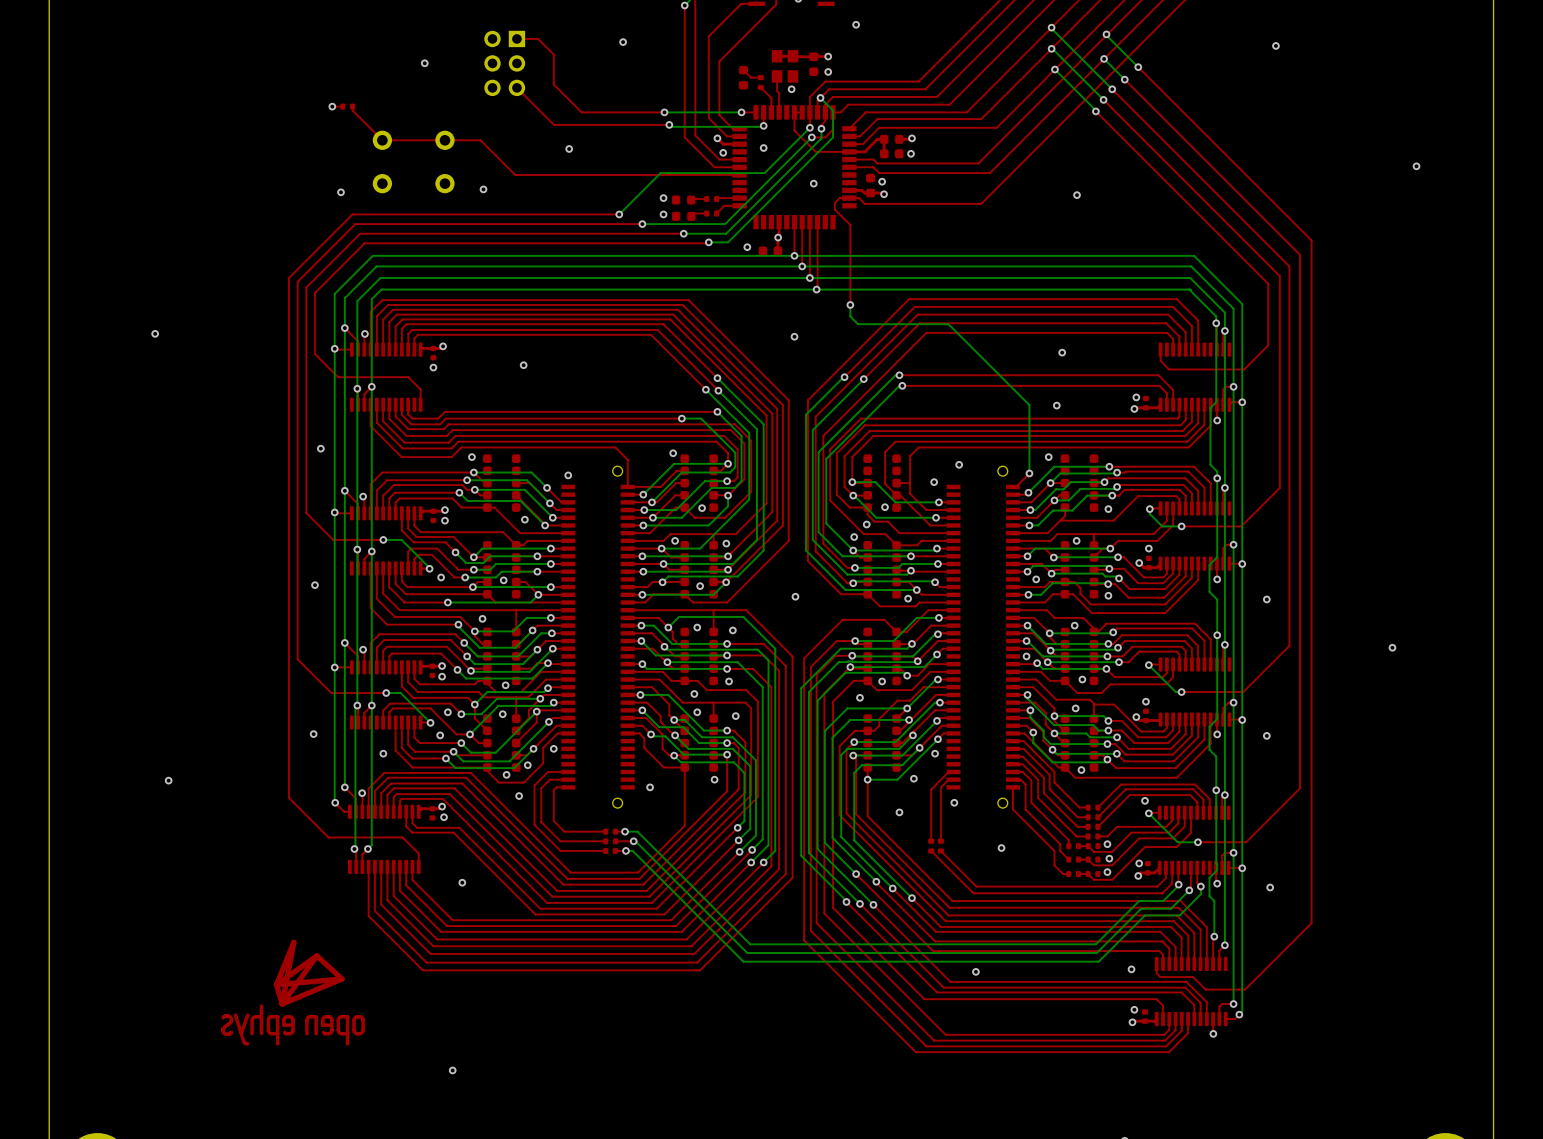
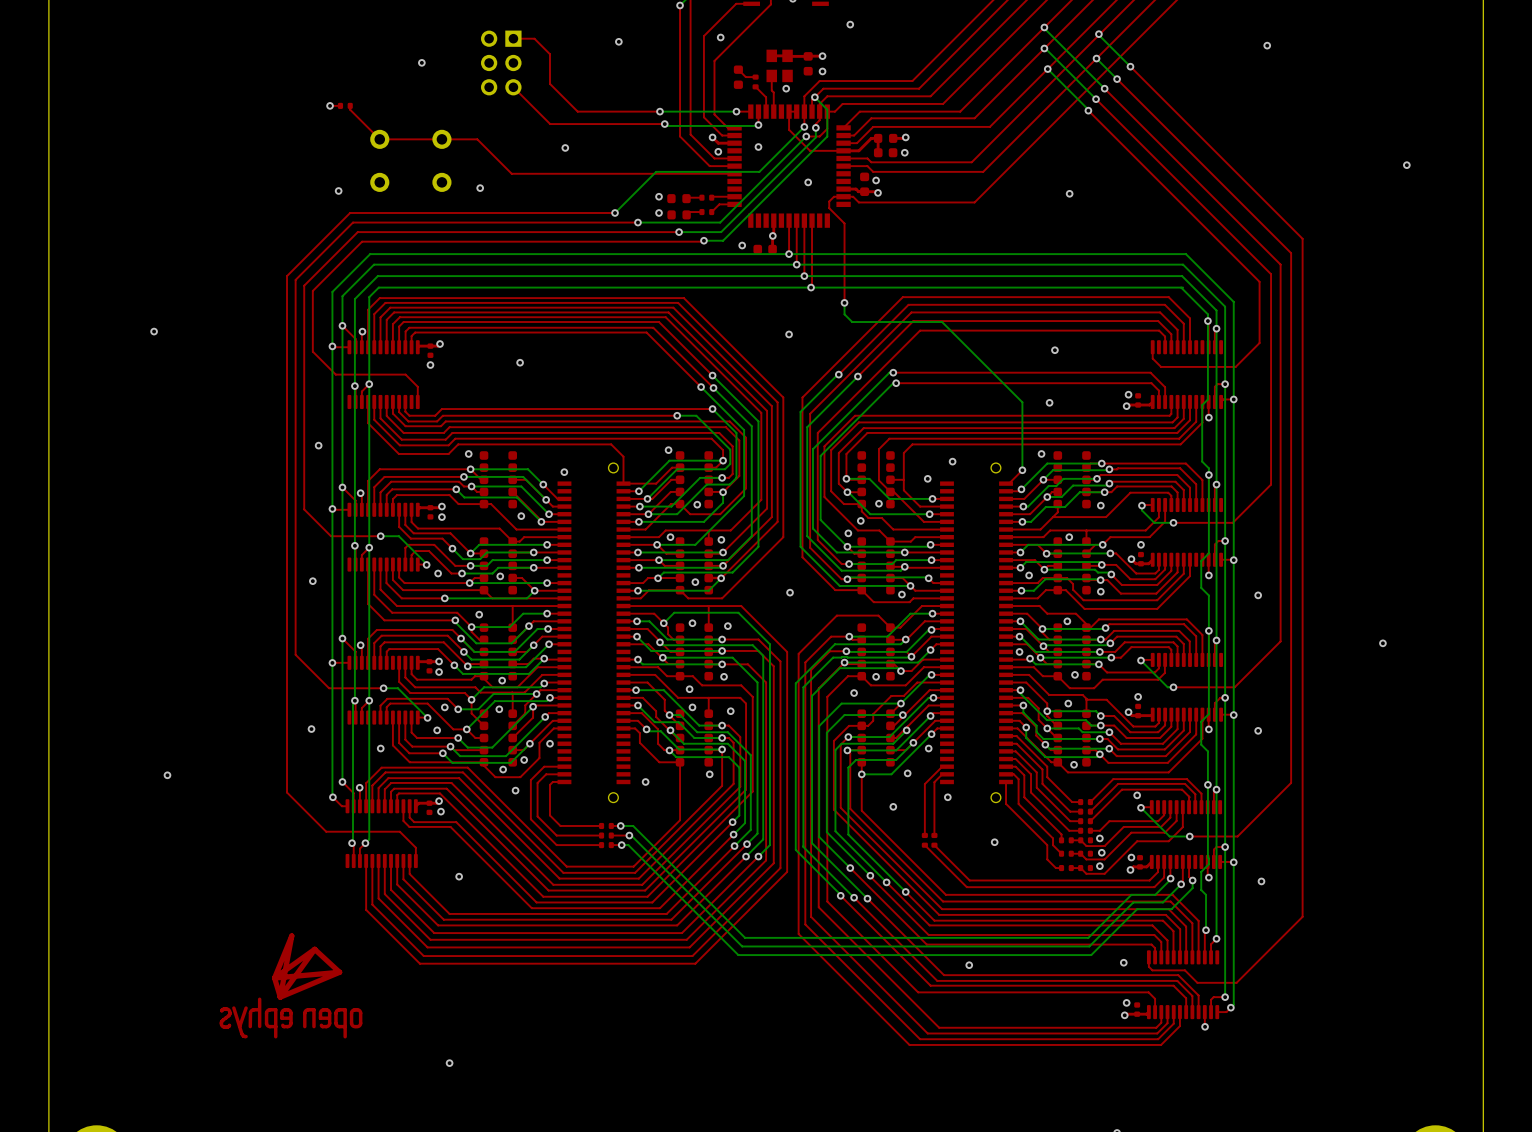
via: none -> (720, 37)

